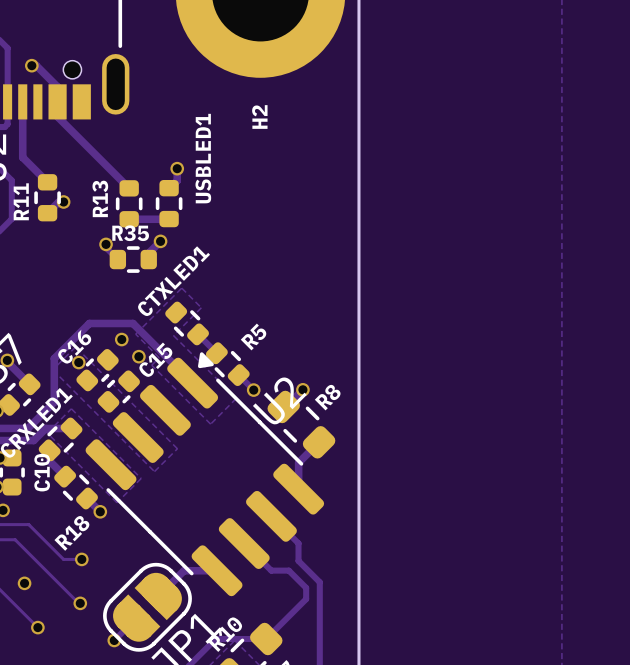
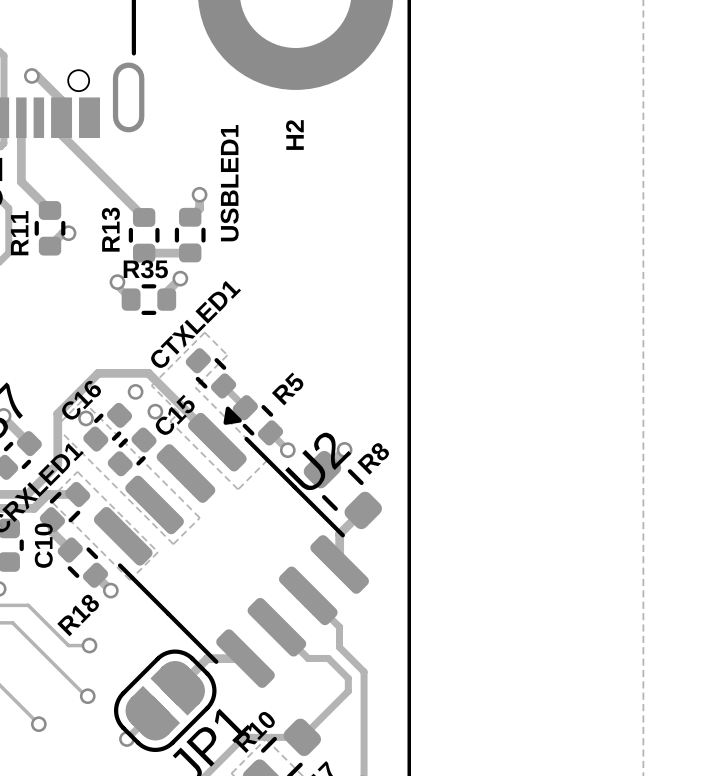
via: (24, 583) -> none

